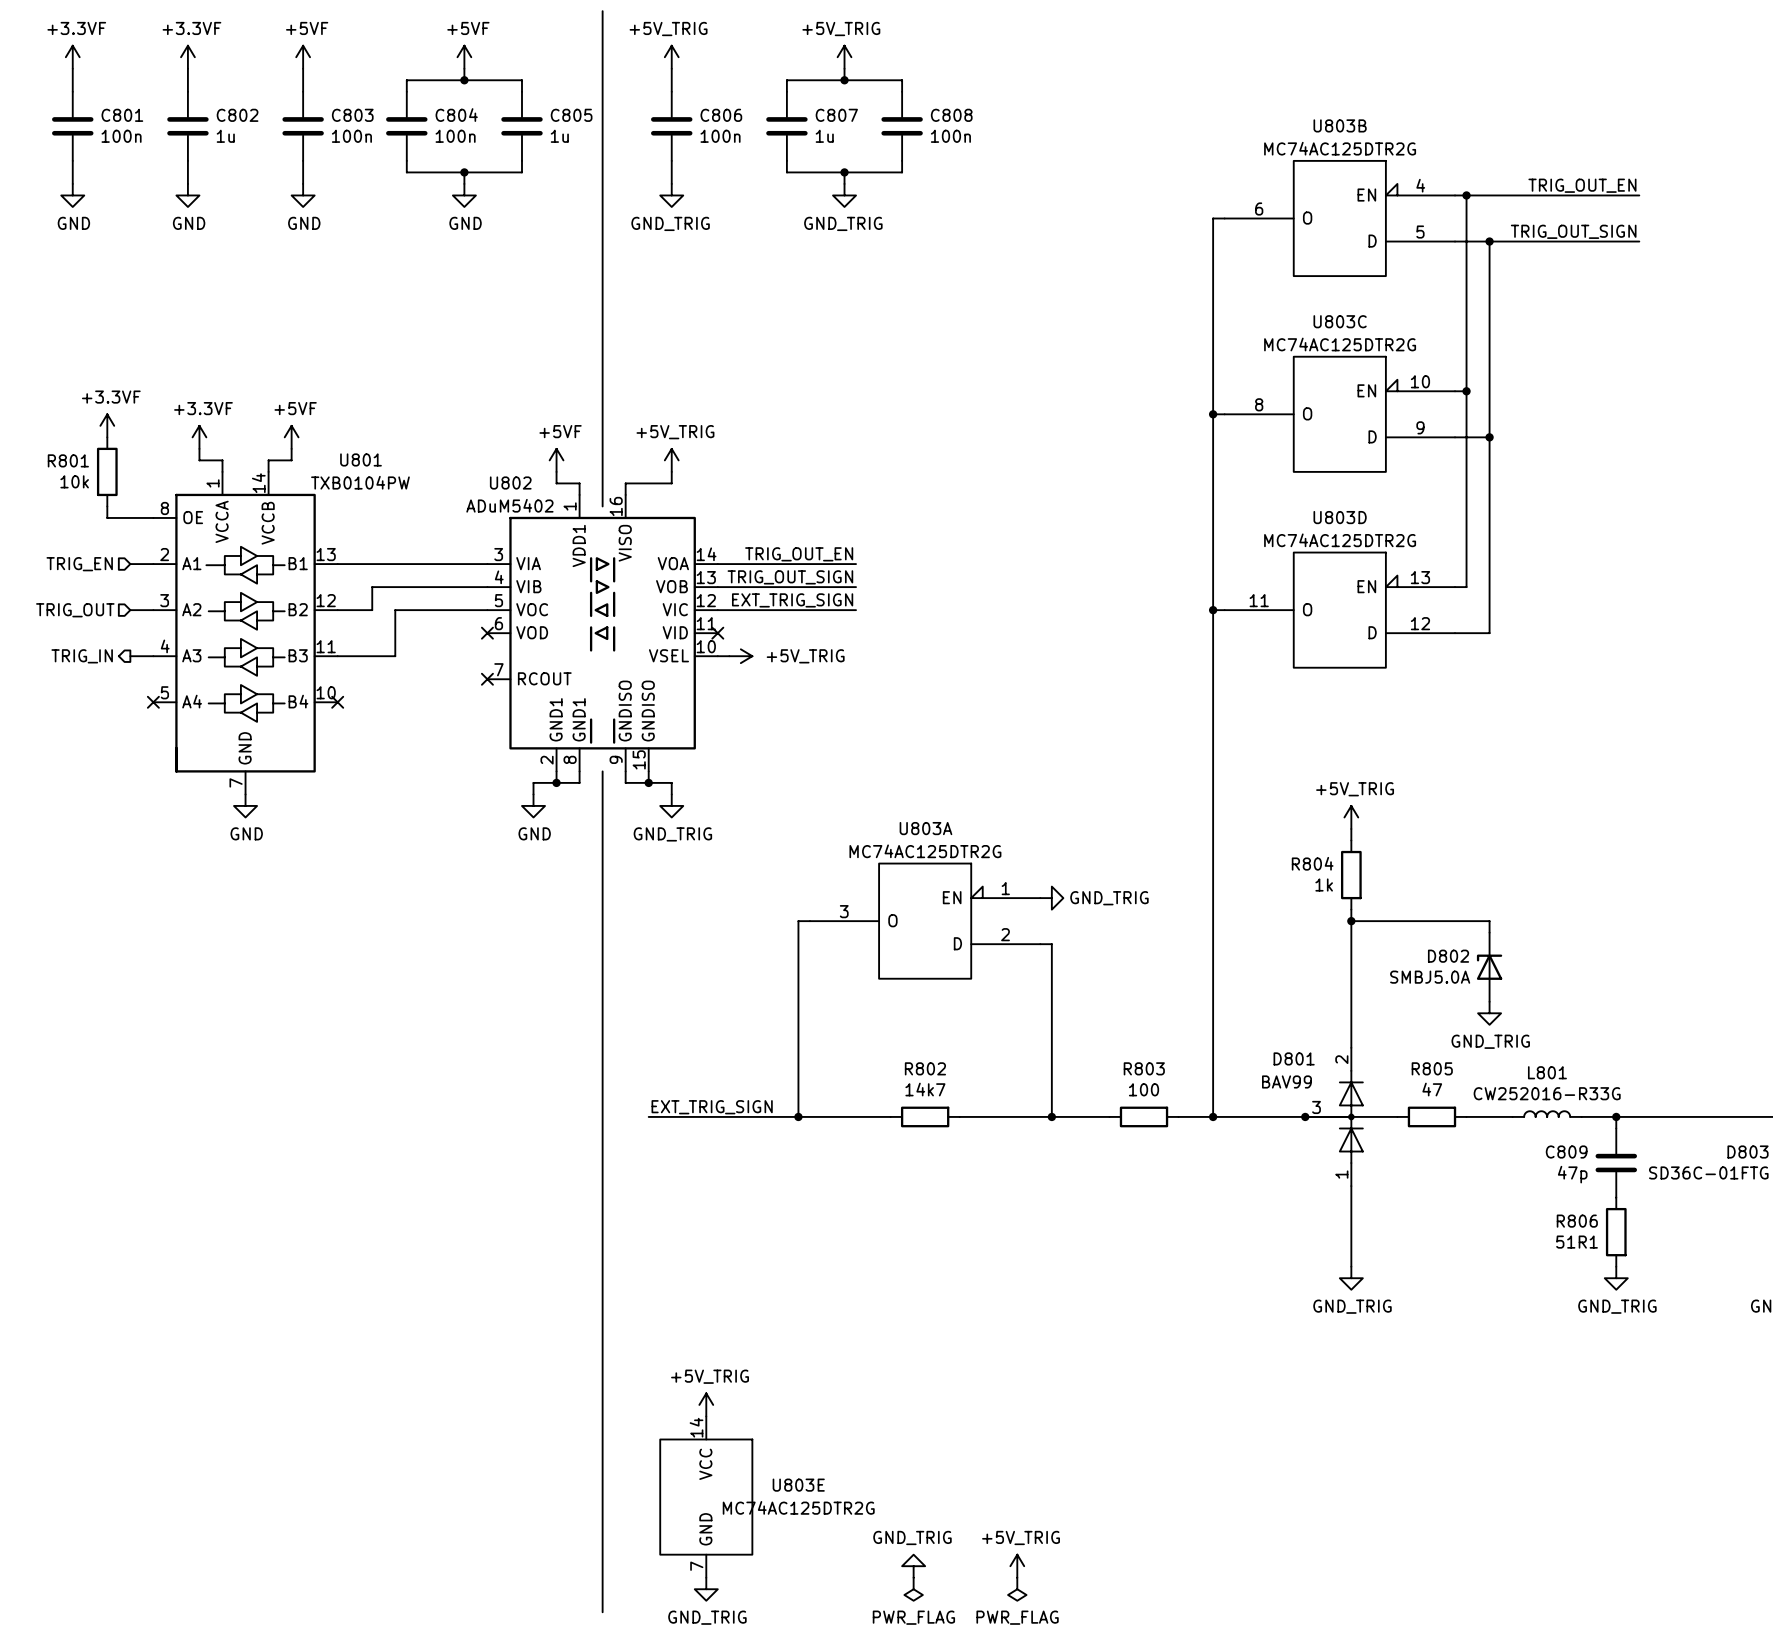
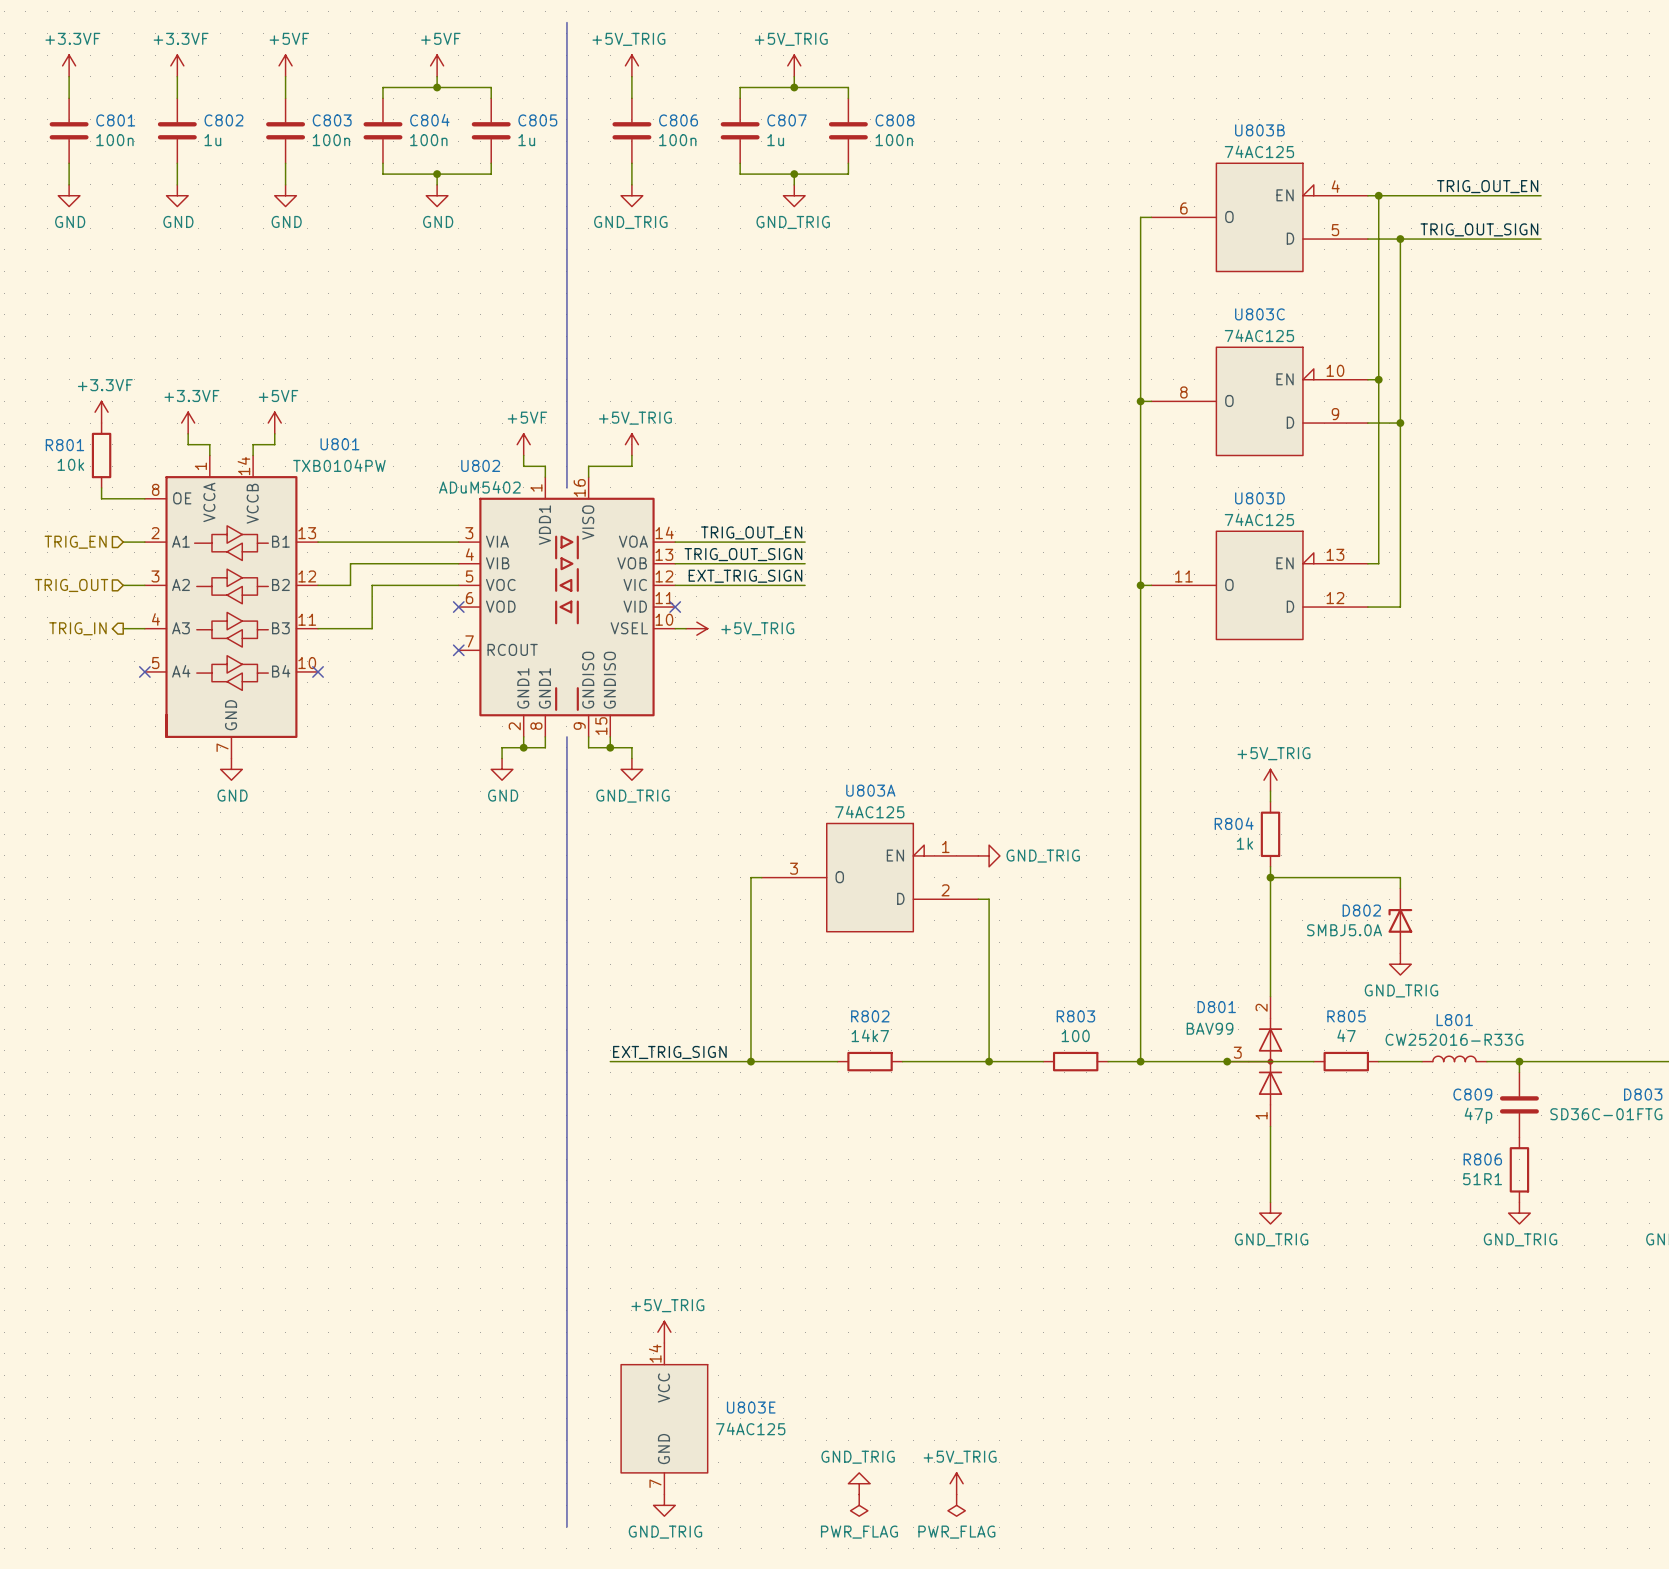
U803B value: MC74AC125DTR2G (1340, 148) -> 74AC125 (1259, 151)
U803C value: MC74AC125DTR2G (1340, 344) -> 74AC125 (1259, 335)
U803D value: MC74AC125DTR2G (1340, 540) -> 74AC125 (1259, 519)
U803A value: MC74AC125DTR2G (925, 851) -> 74AC125 (869, 812)
U803E value: MC74AC125DTR2G (798, 1507) -> 74AC125 (750, 1428)

